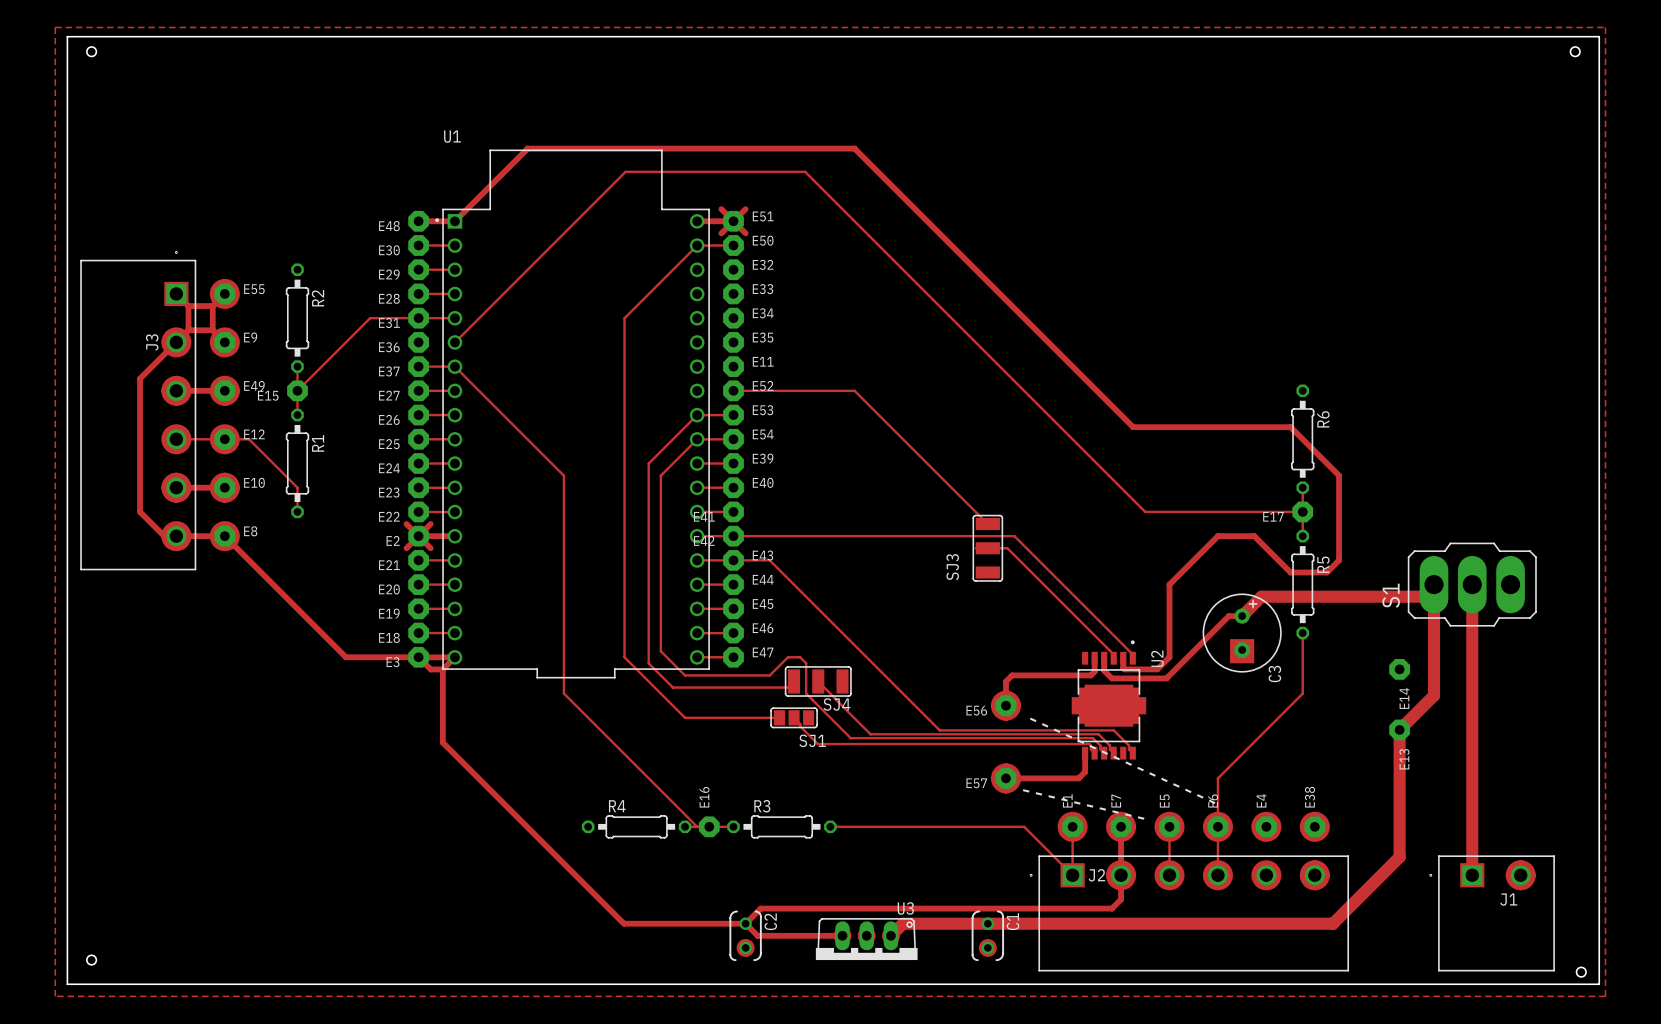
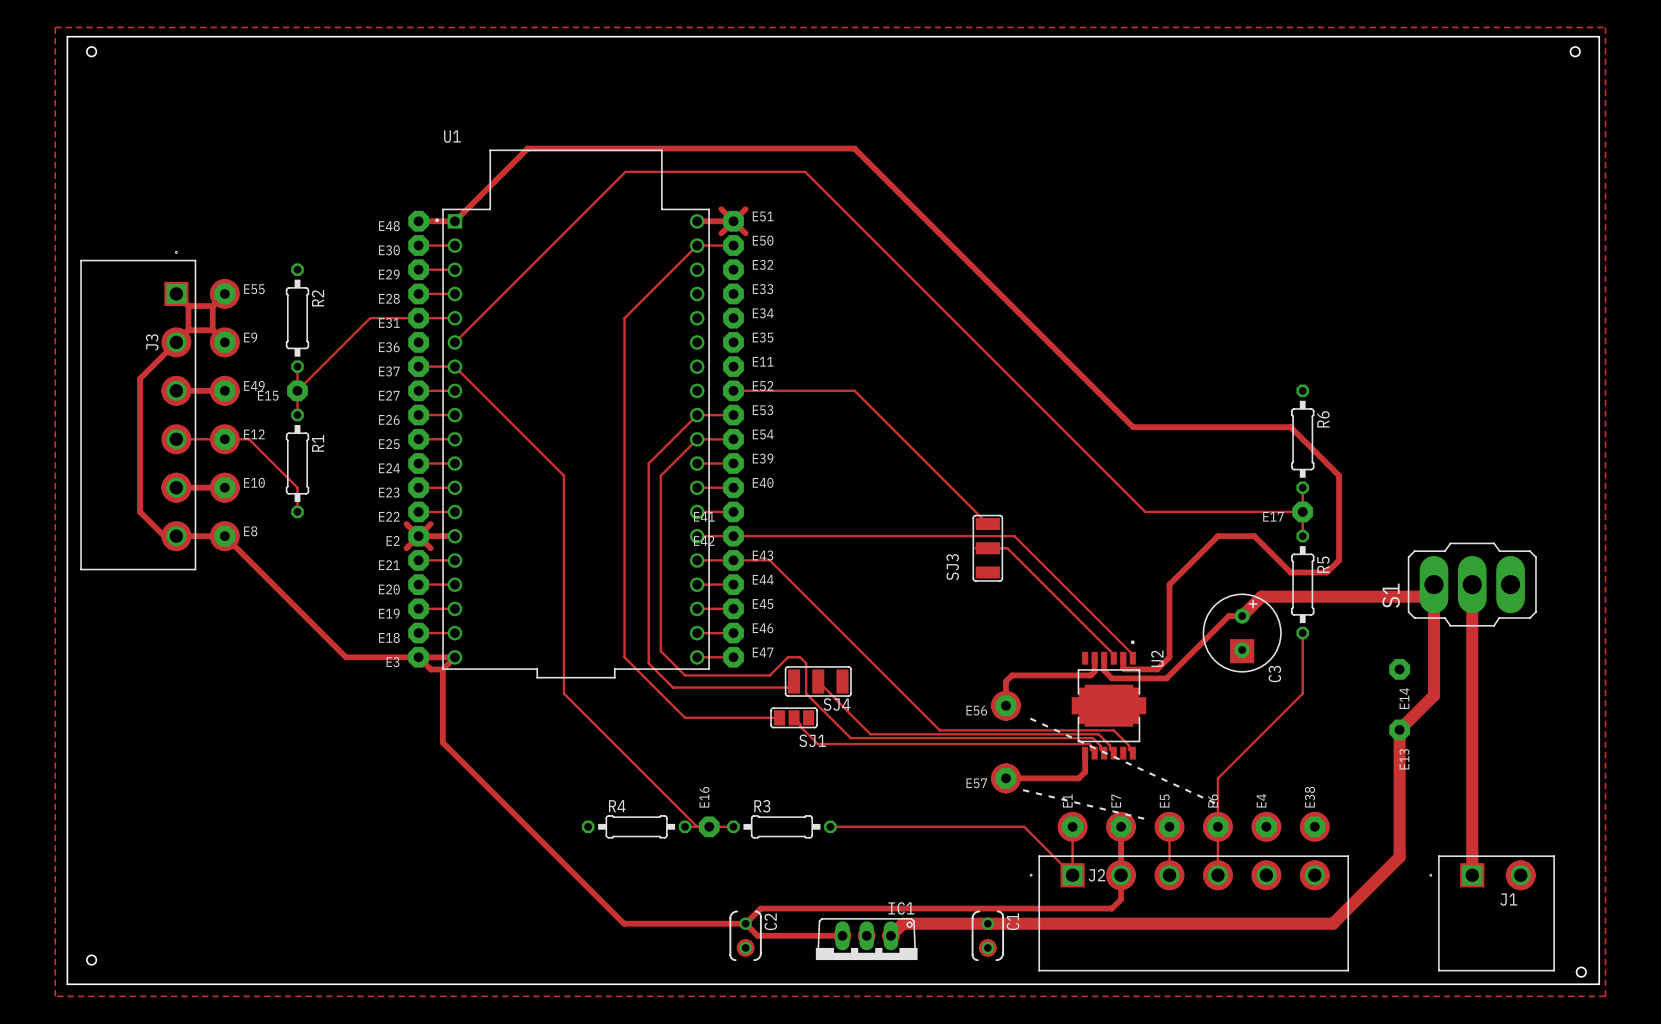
U3 name: U3 (905, 908) -> IC1 (901, 908)

